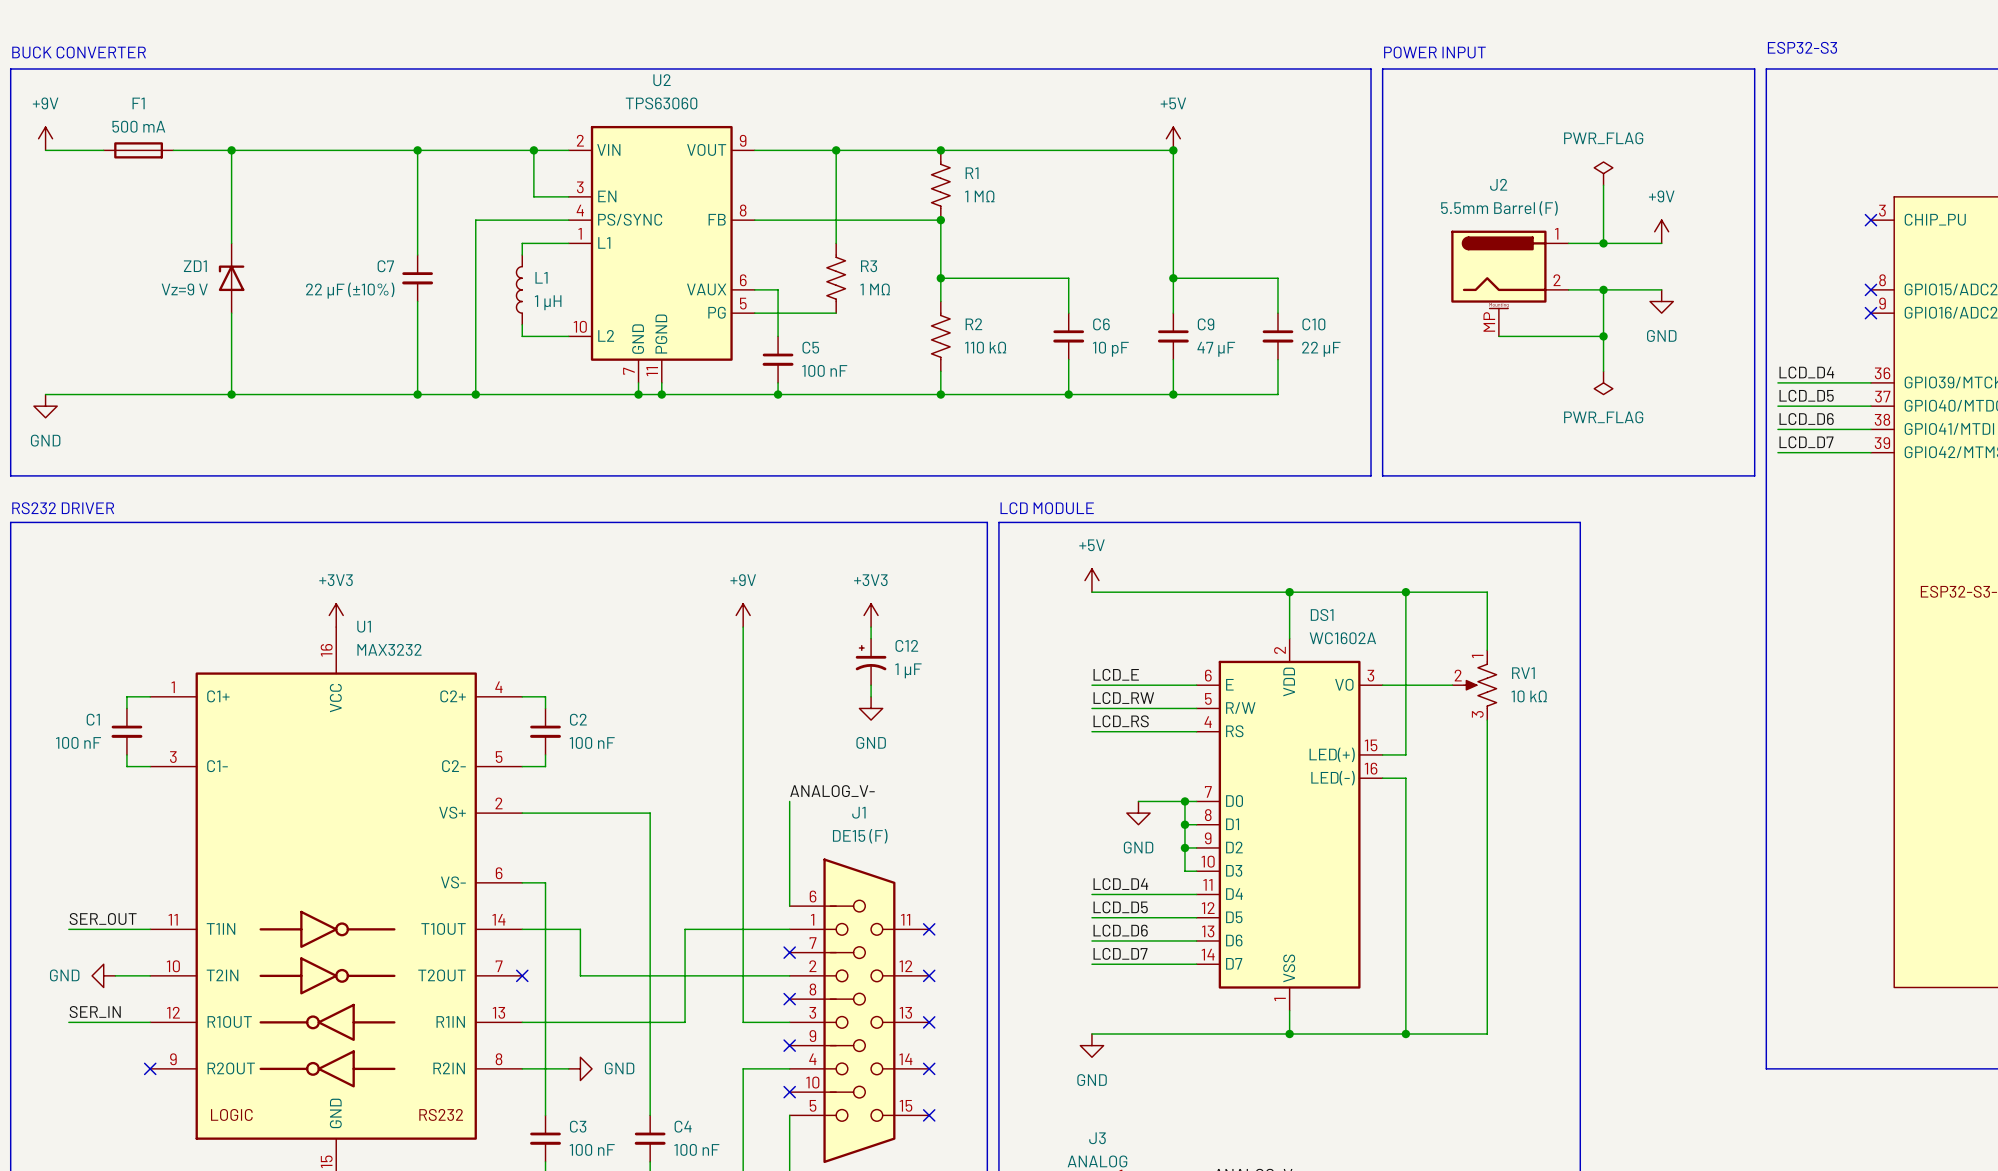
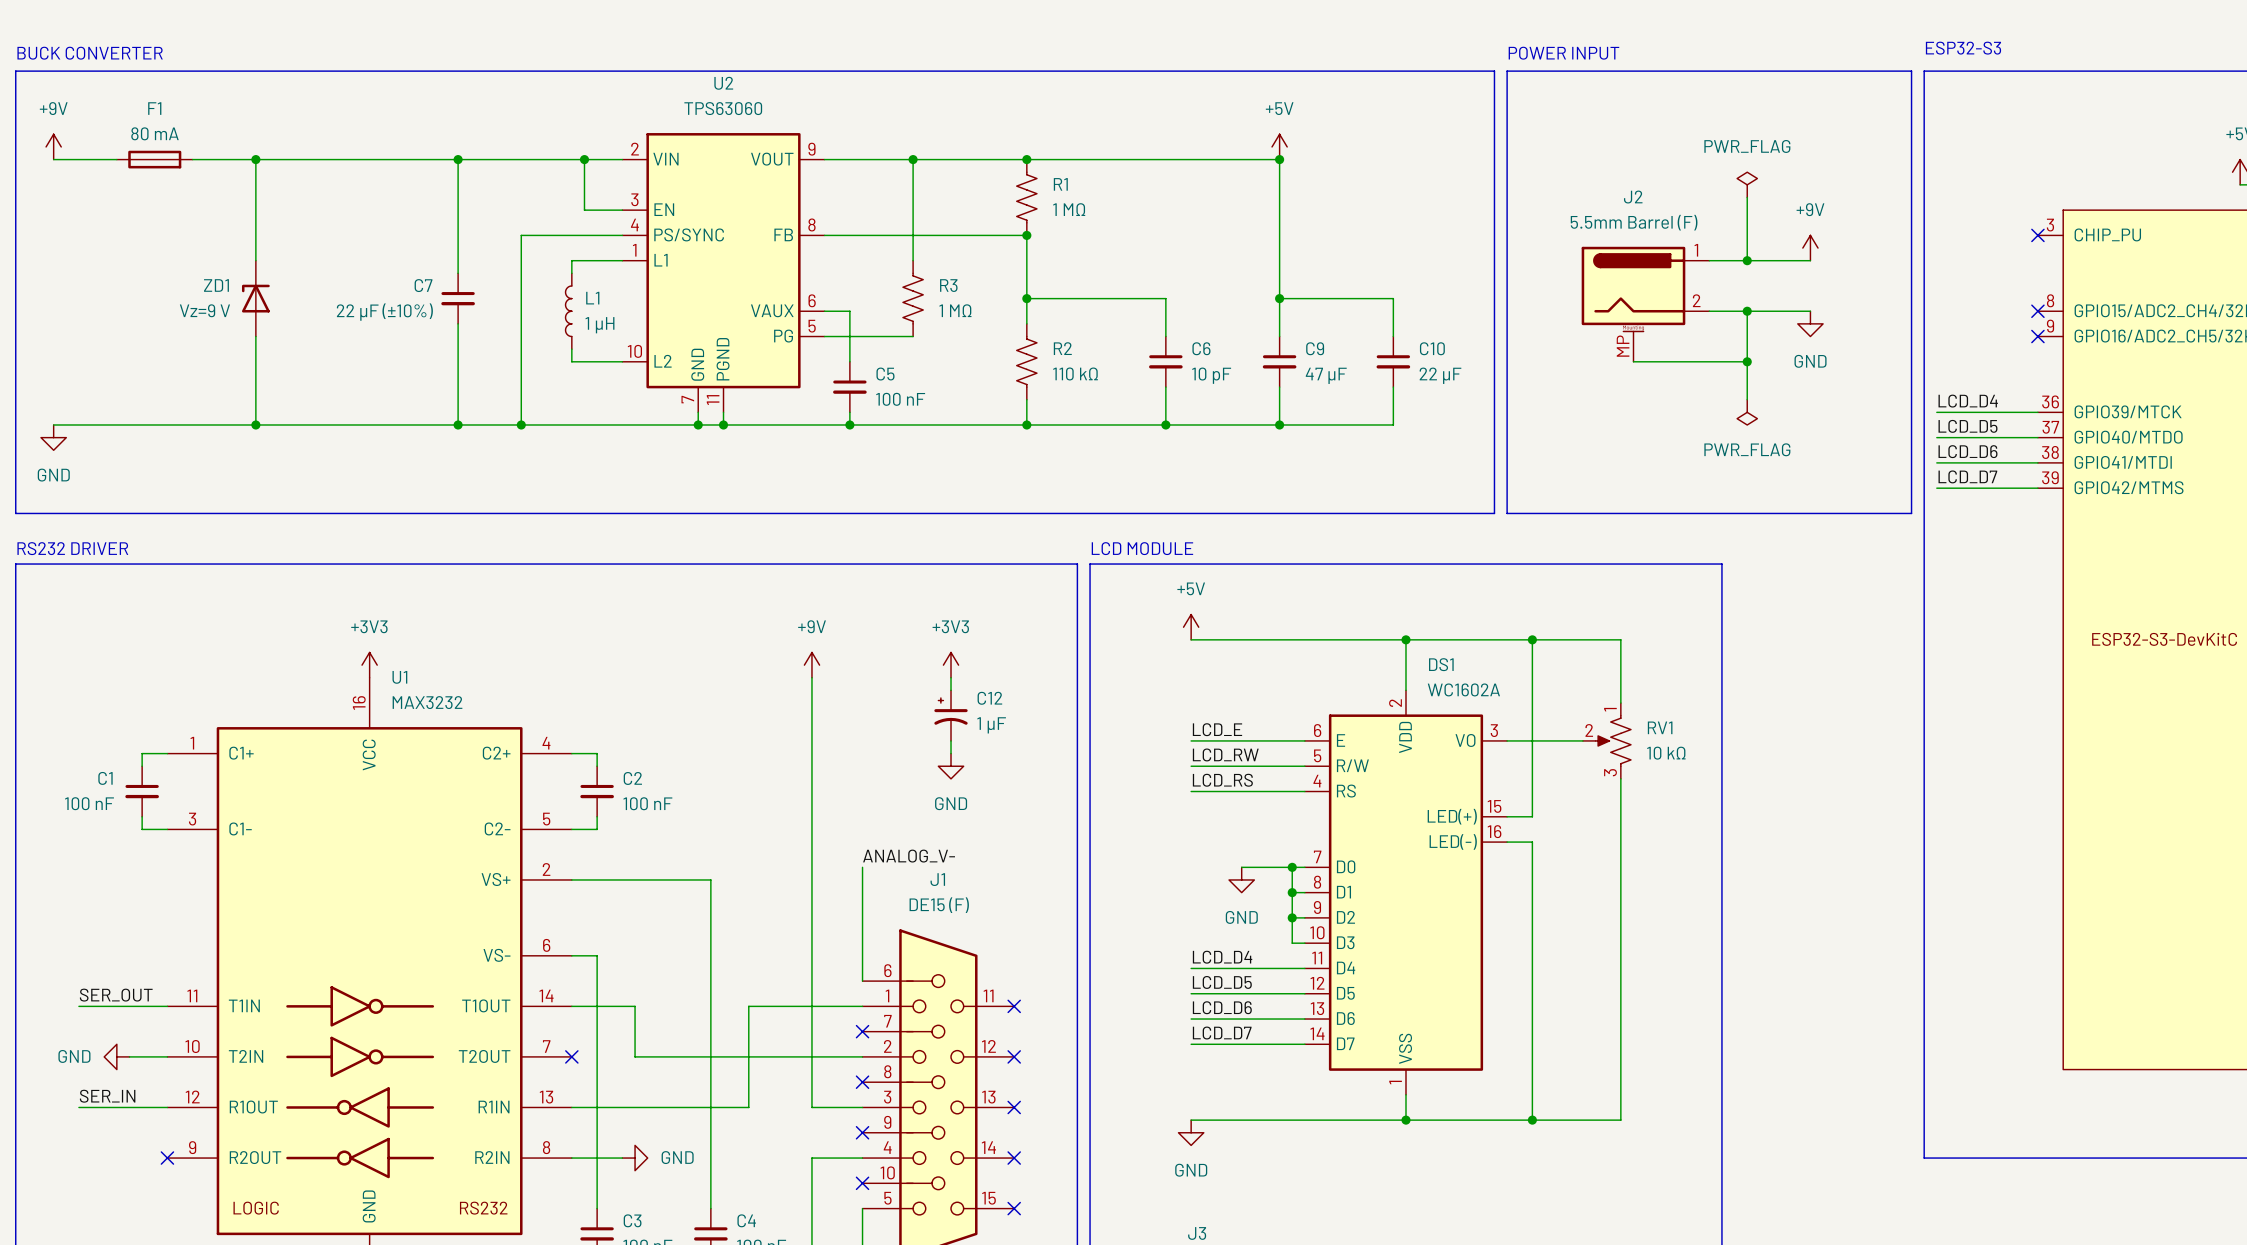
F1 value: 500 mA (138, 126) -> 80 mA (154, 133)

